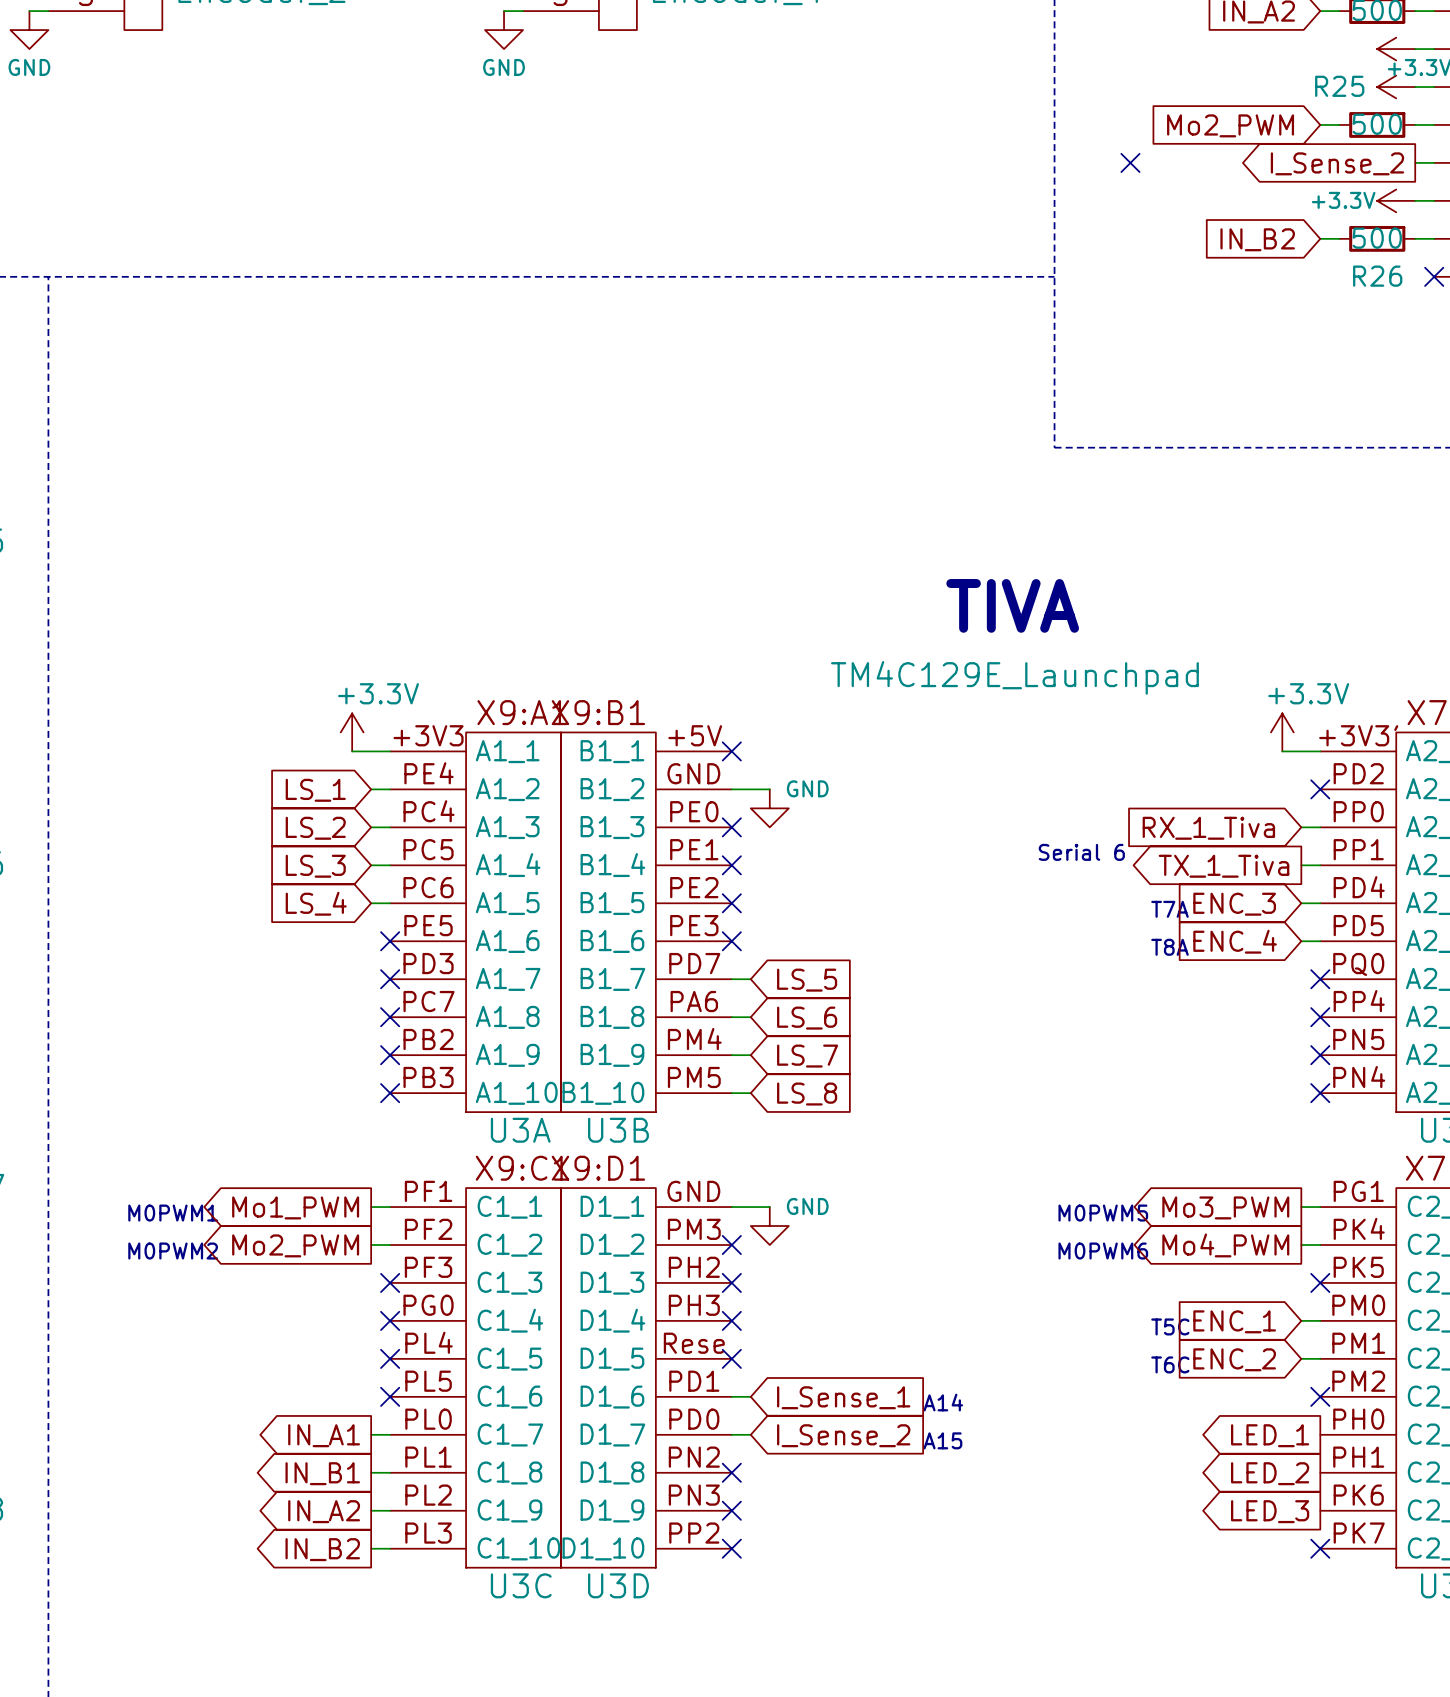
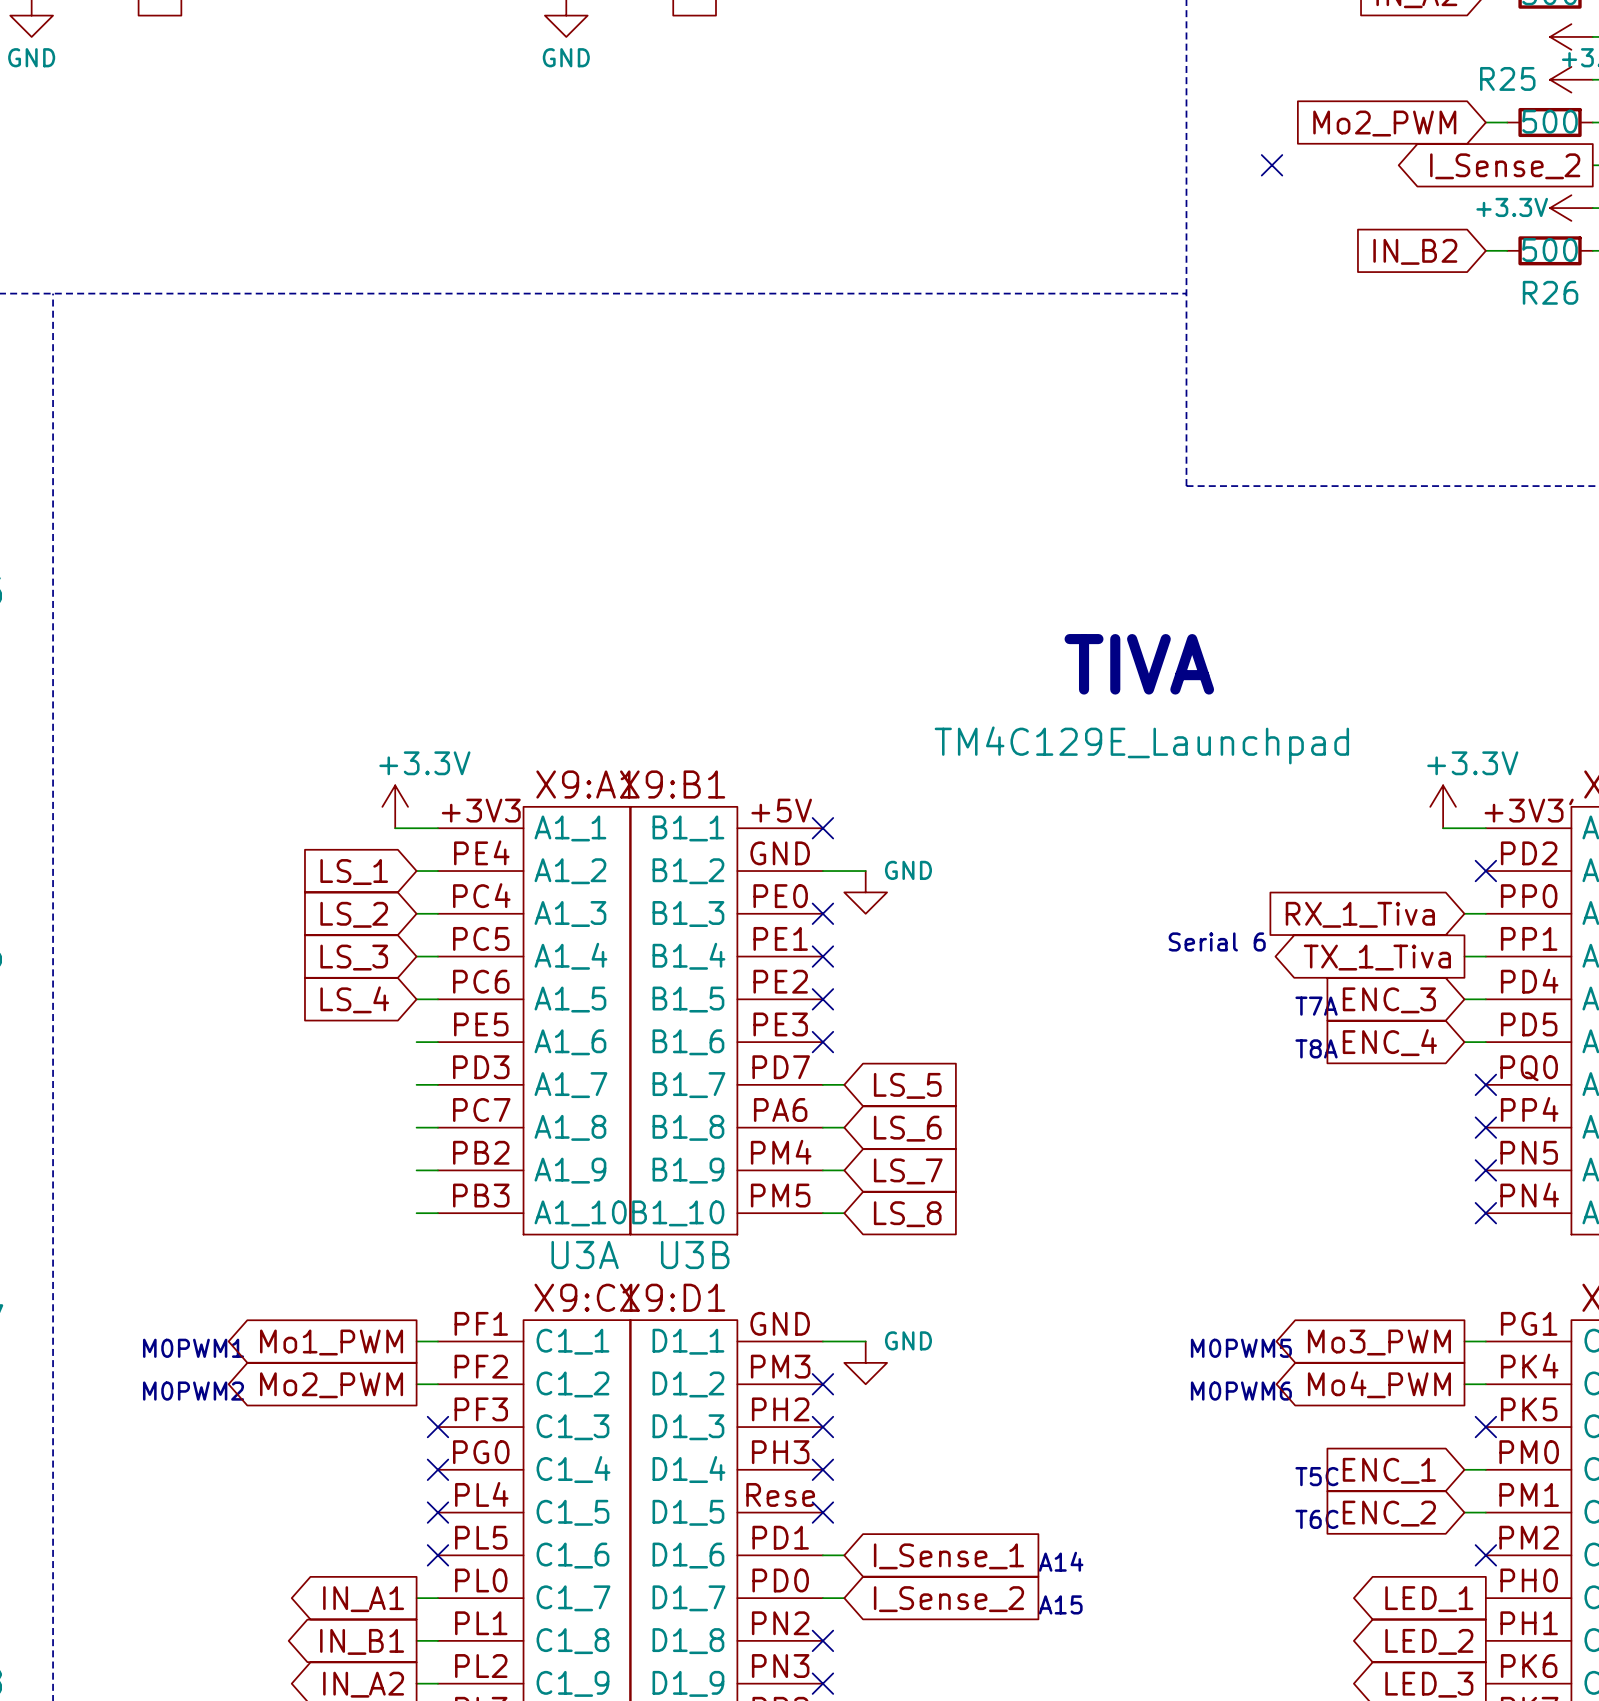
wire: none -> (416, 1042) (437, 1042)
no-connect mark: (390, 941) -> none
wire: none -> (416, 1084) (437, 1084)
no-connect mark: (390, 979) -> none
wire: none -> (416, 1127) (437, 1127)
no-connect mark: (390, 1017) -> none
wire: none -> (416, 1170) (437, 1170)
no-connect mark: (390, 1055) -> none
wire: none -> (416, 1213) (437, 1213)
no-connect mark: (390, 1093) -> none

